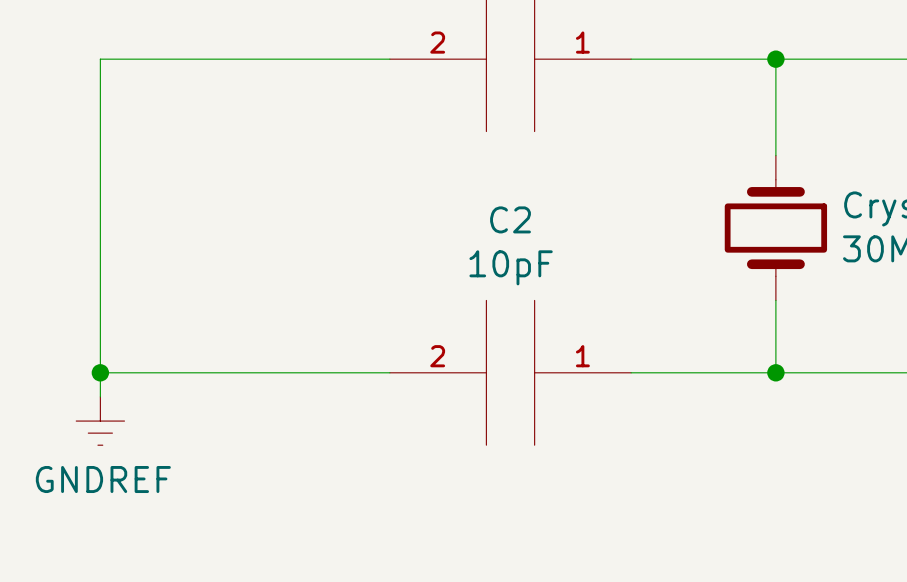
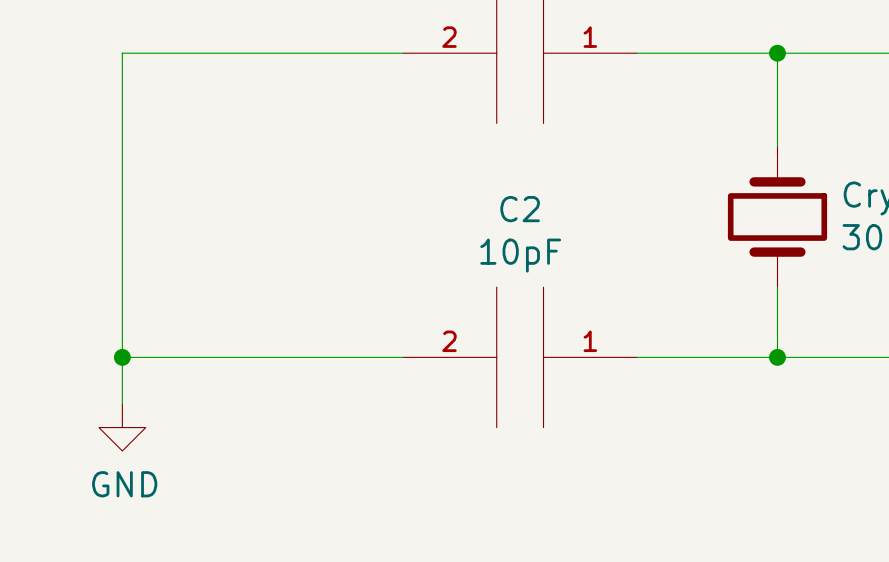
power symbol: GNDREF (100, 421) -> none
power symbol: none -> GND (122, 427)

